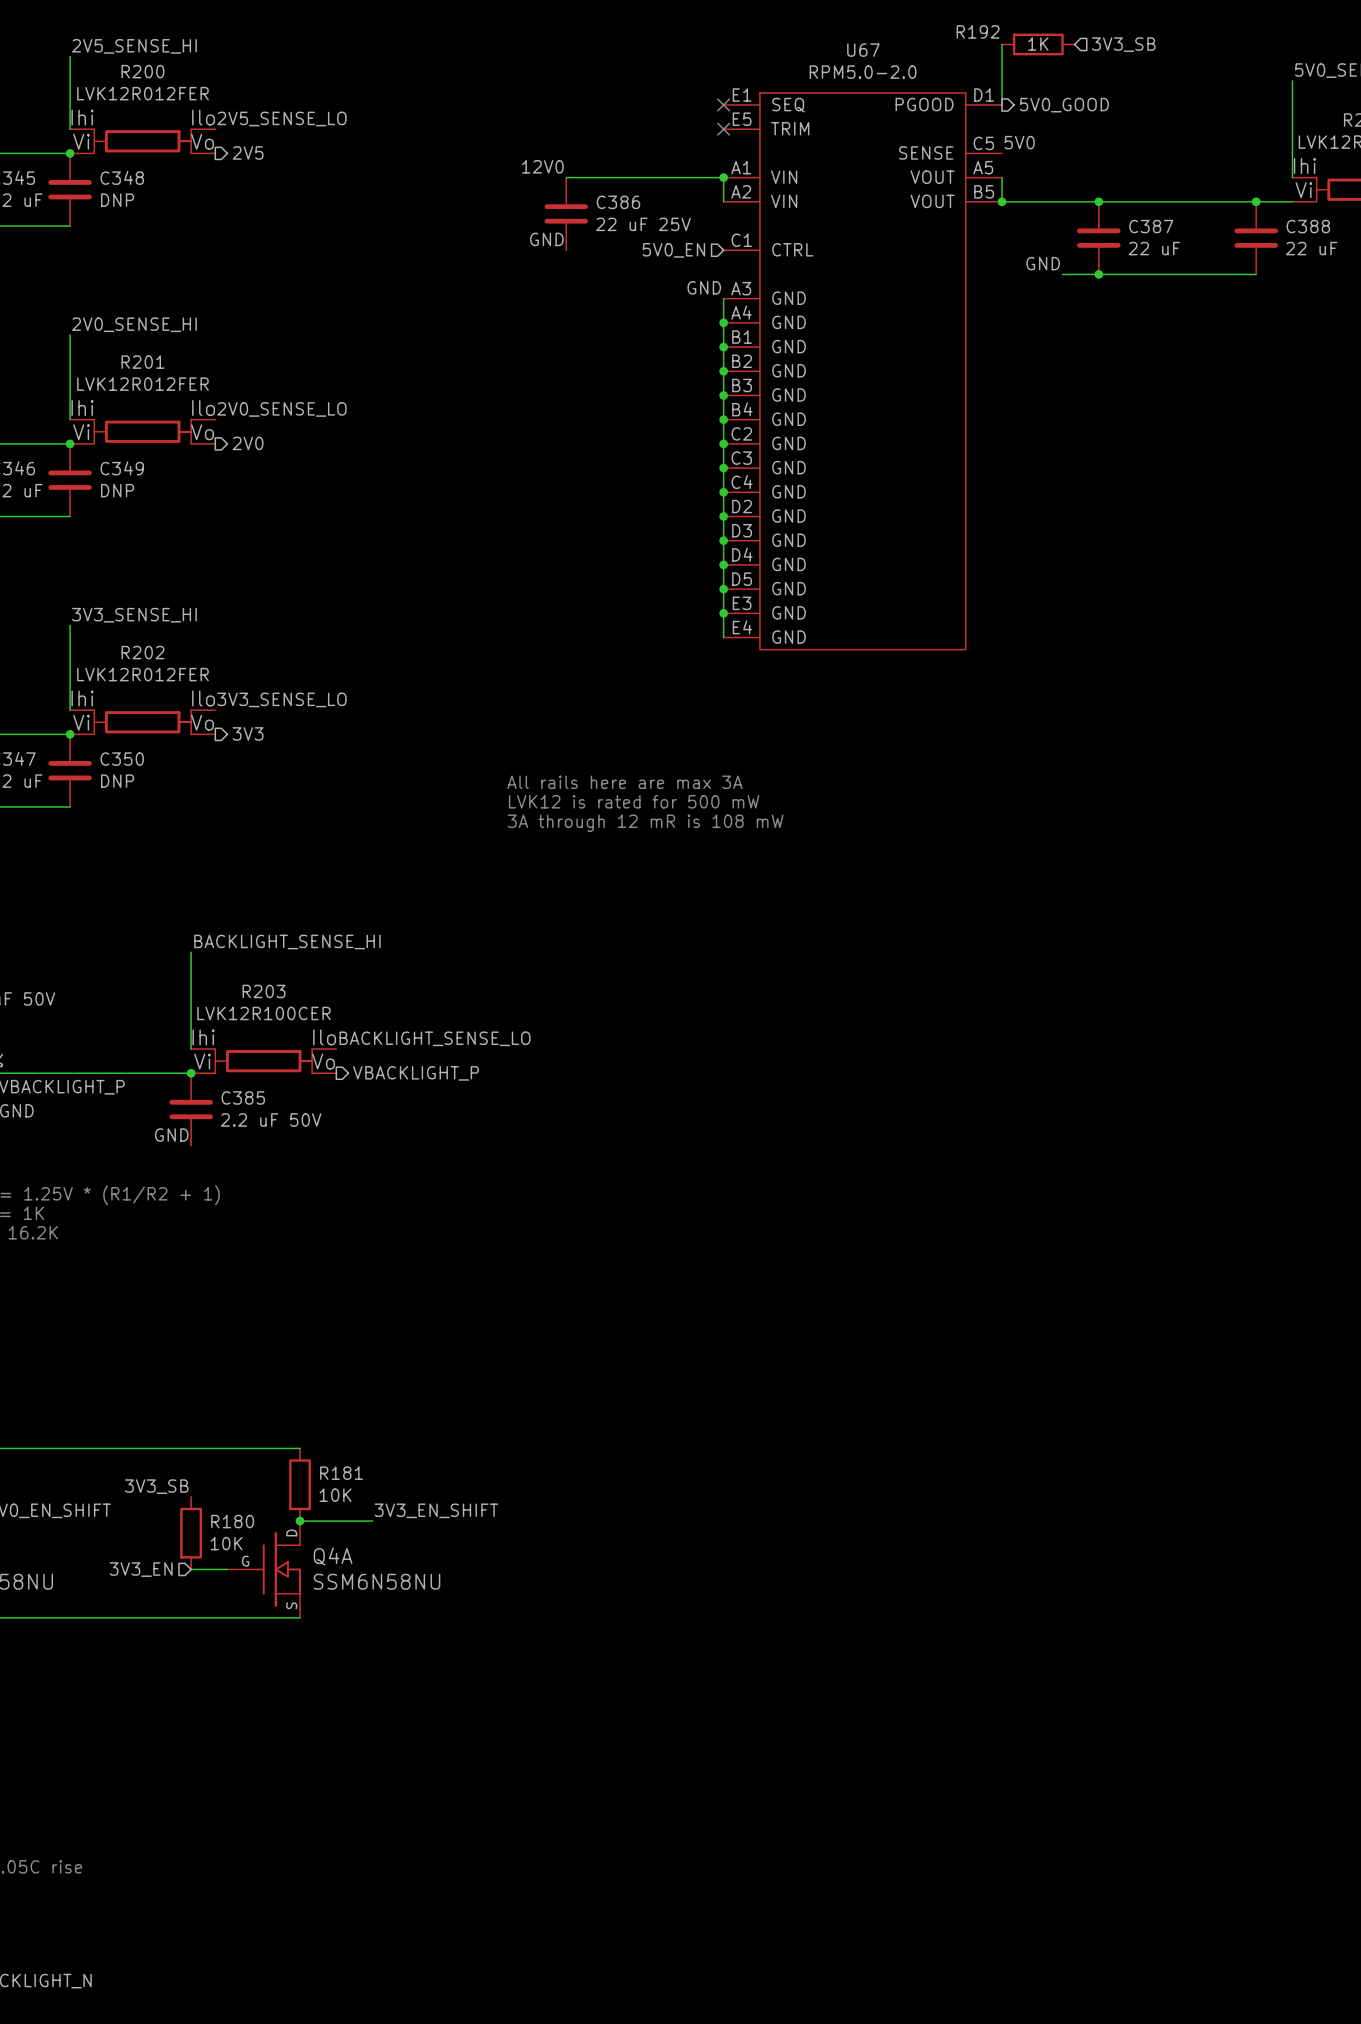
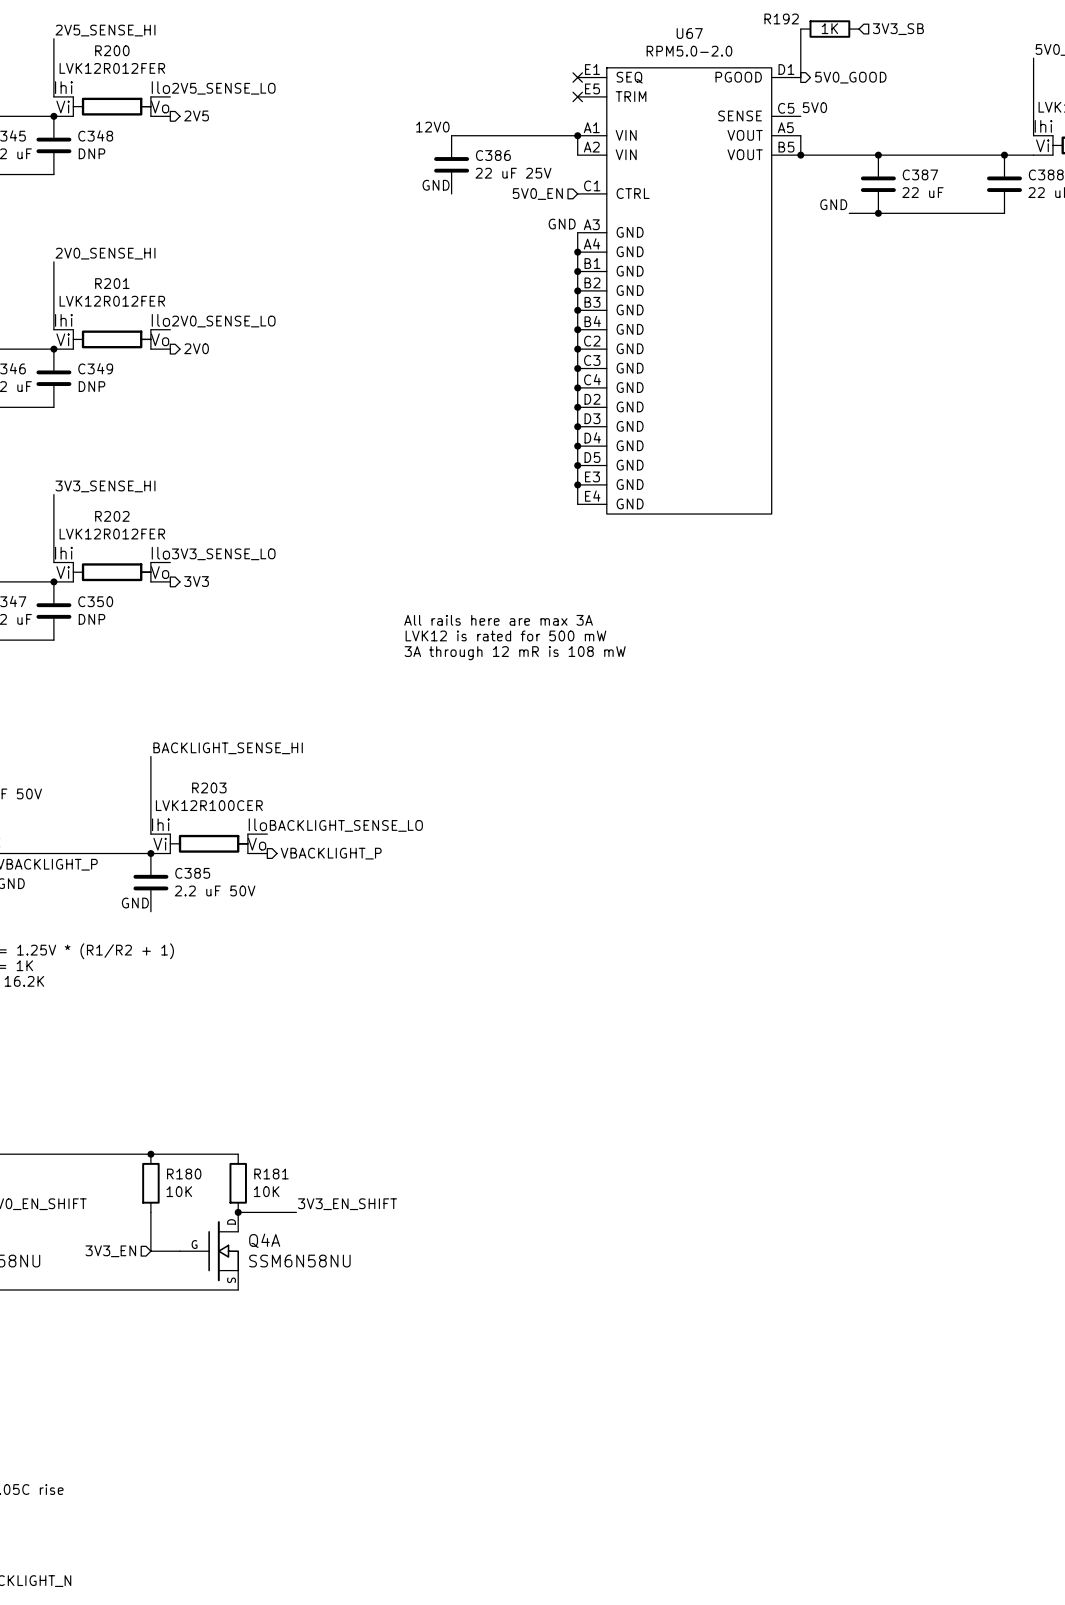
junction: none -> (150, 1154)
label: 3V3_SB (156, 1486) -> none
wire: none -> (150, 1212) (150, 1251)
R180 position: (191, 1533) -> (150, 1183)

